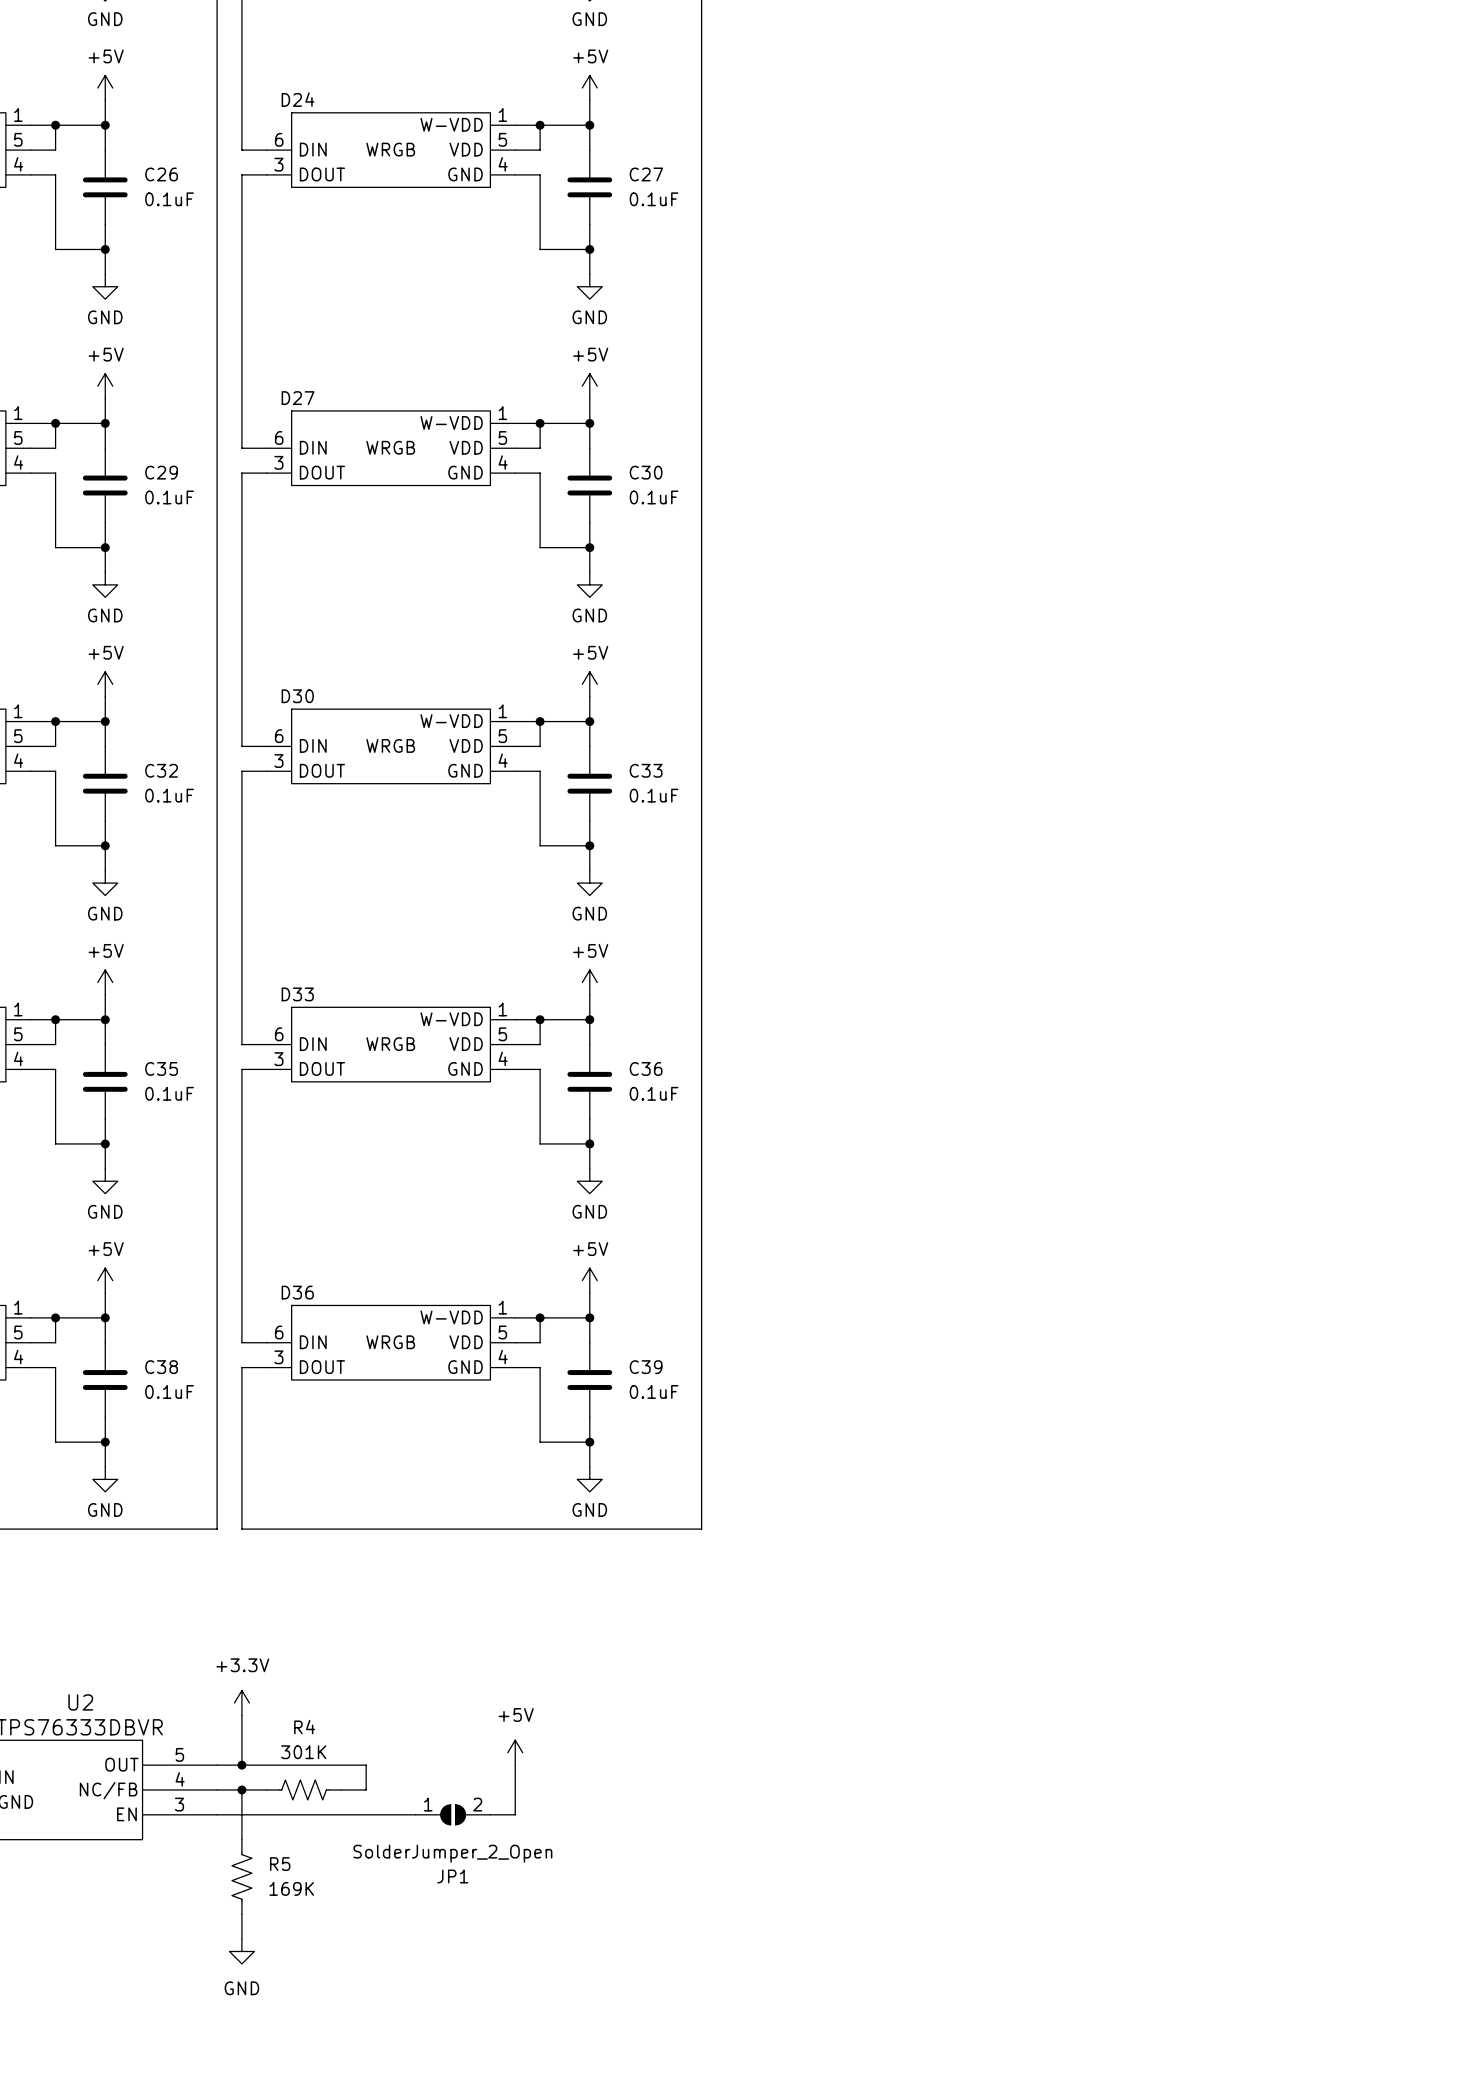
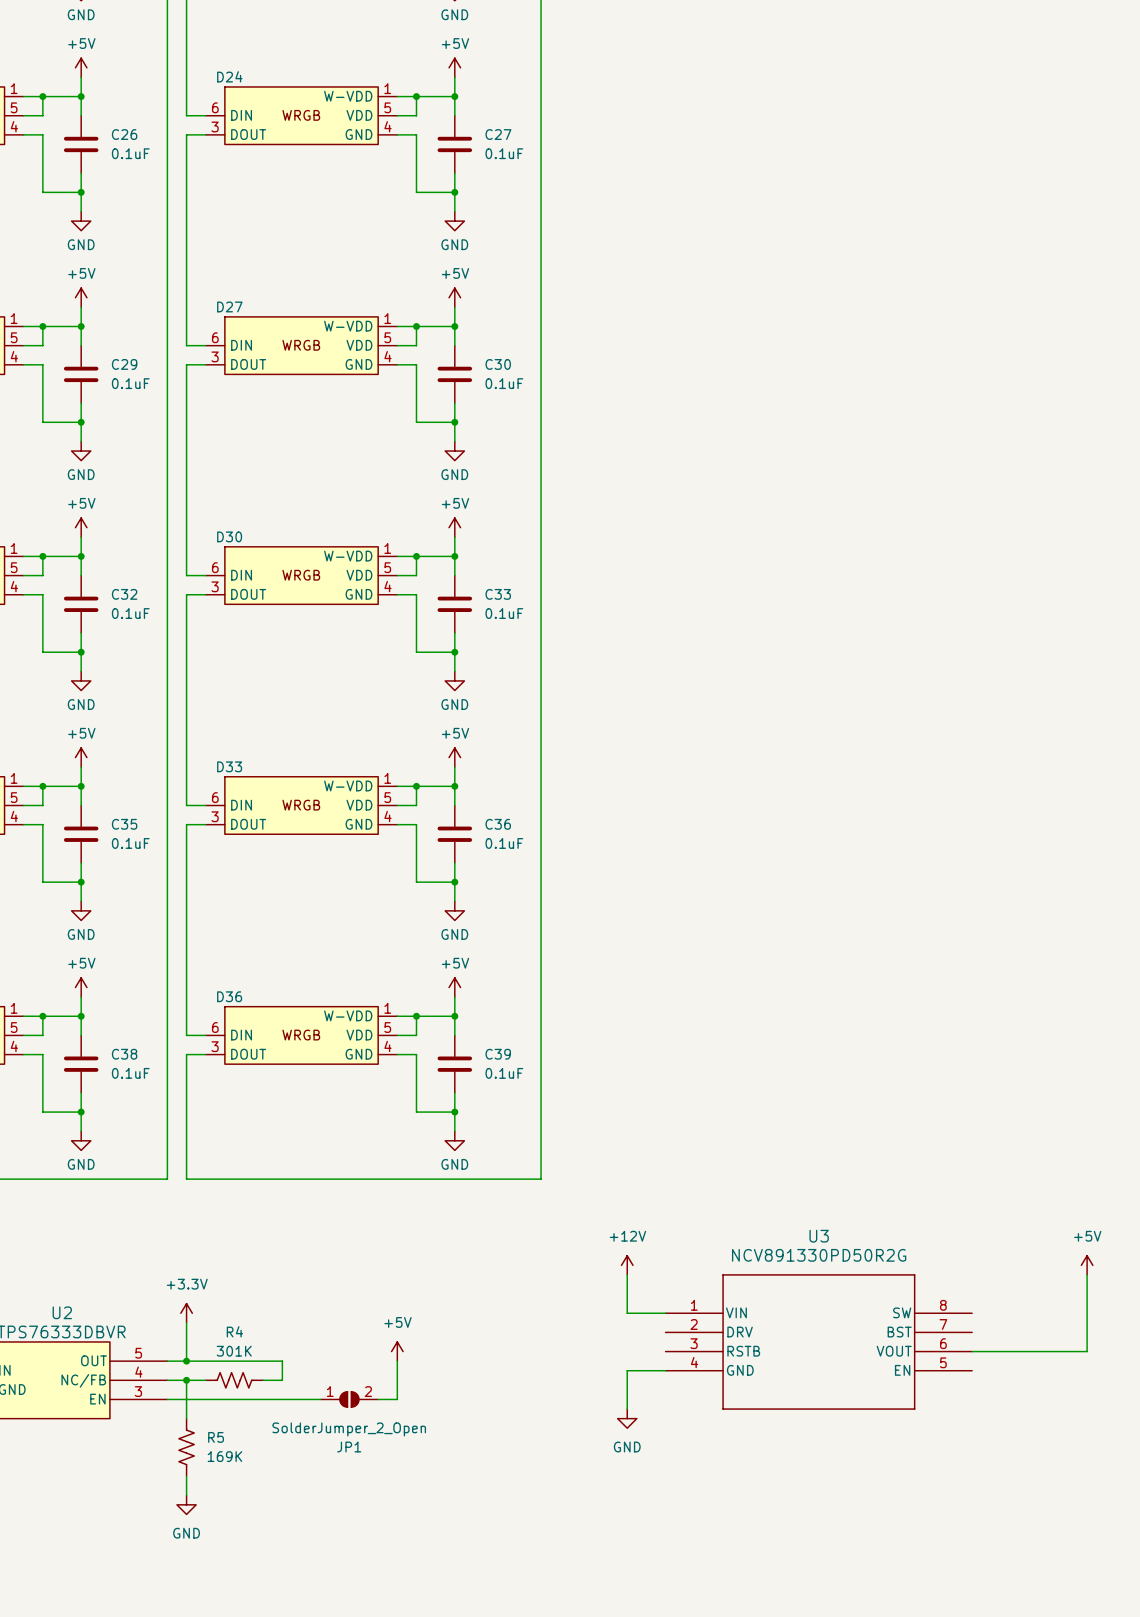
power symbol: none -> +12V (627, 1265)
power symbol: none -> +5V (1087, 1265)
wire: none -> (627, 1274) (627, 1313) (665, 1313)
wire: none -> (1087, 1274) (1087, 1351) (972, 1351)
U3: none -> NCV891330PD50R2G (818, 1341)
wire: none -> (665, 1370) (627, 1370) (627, 1409)
power symbol: none -> GND (627, 1418)

